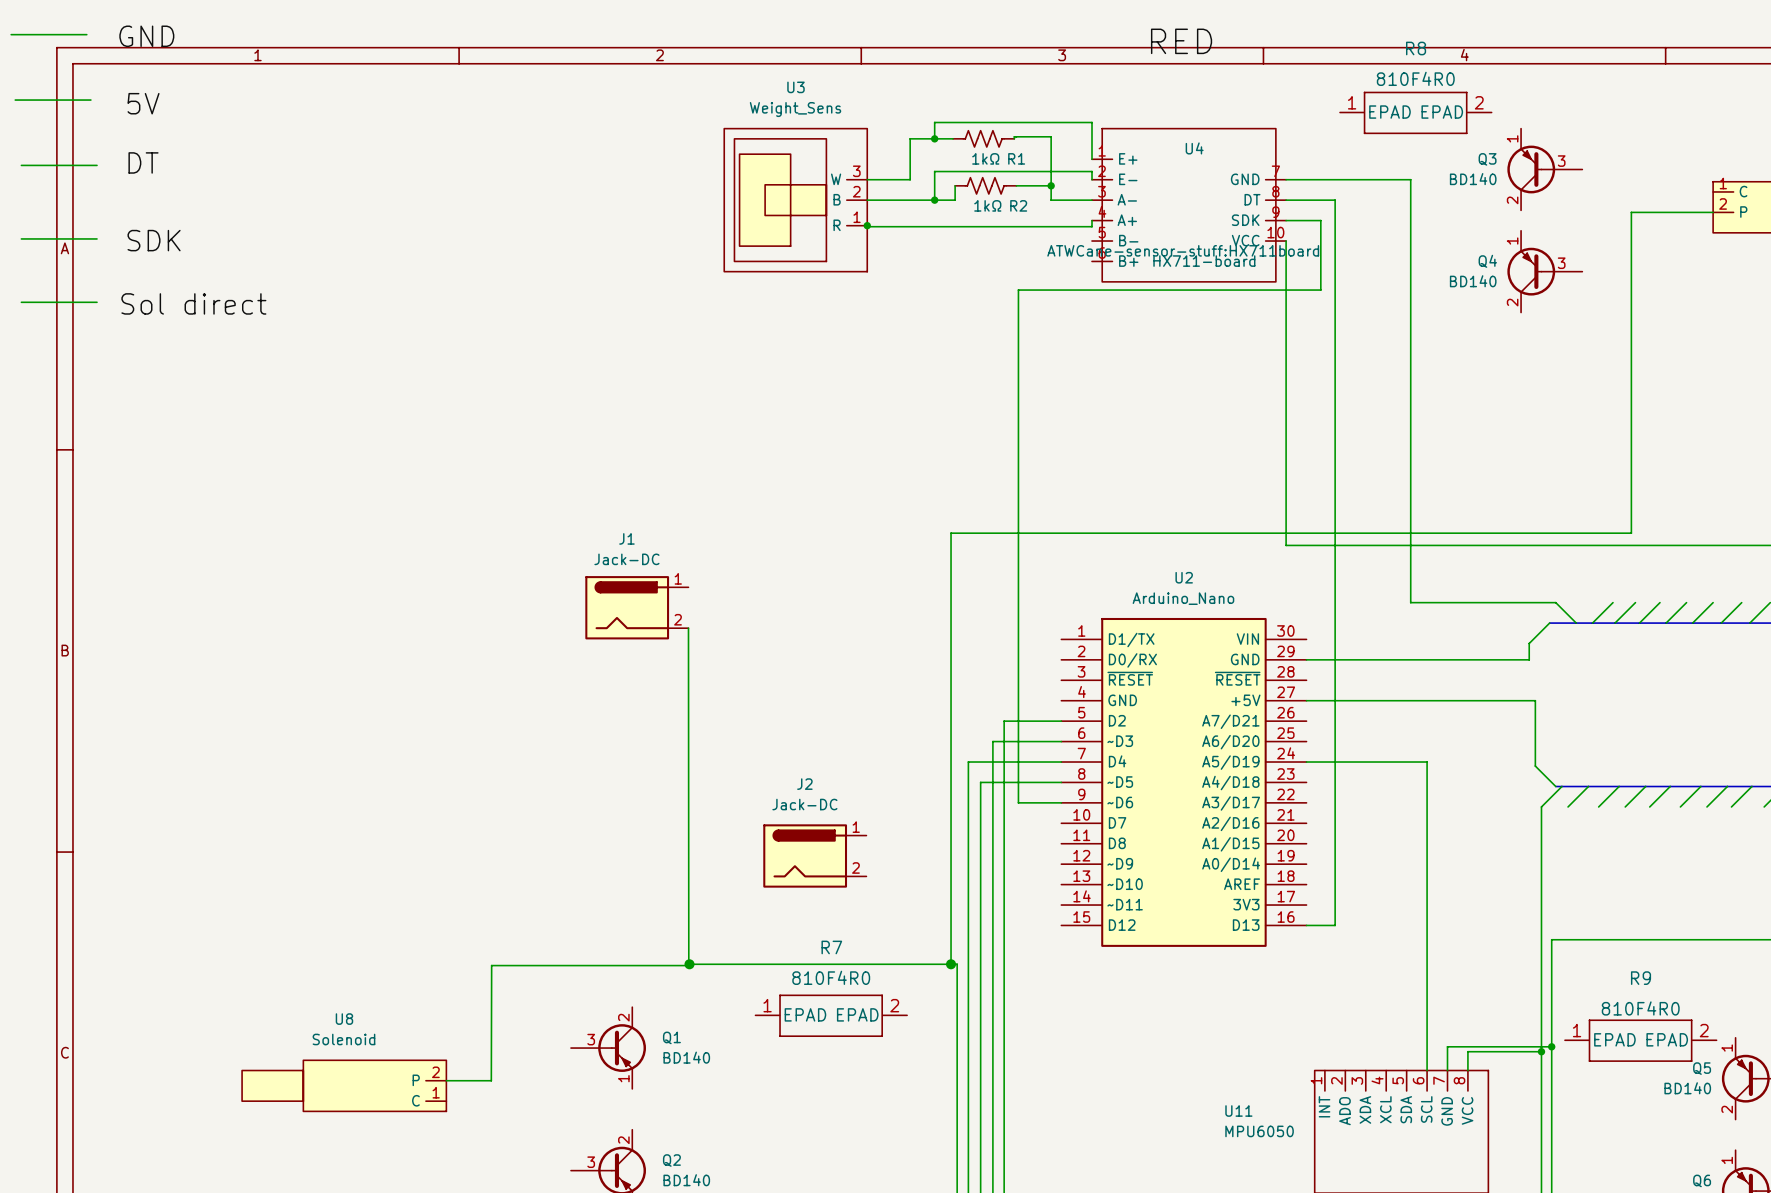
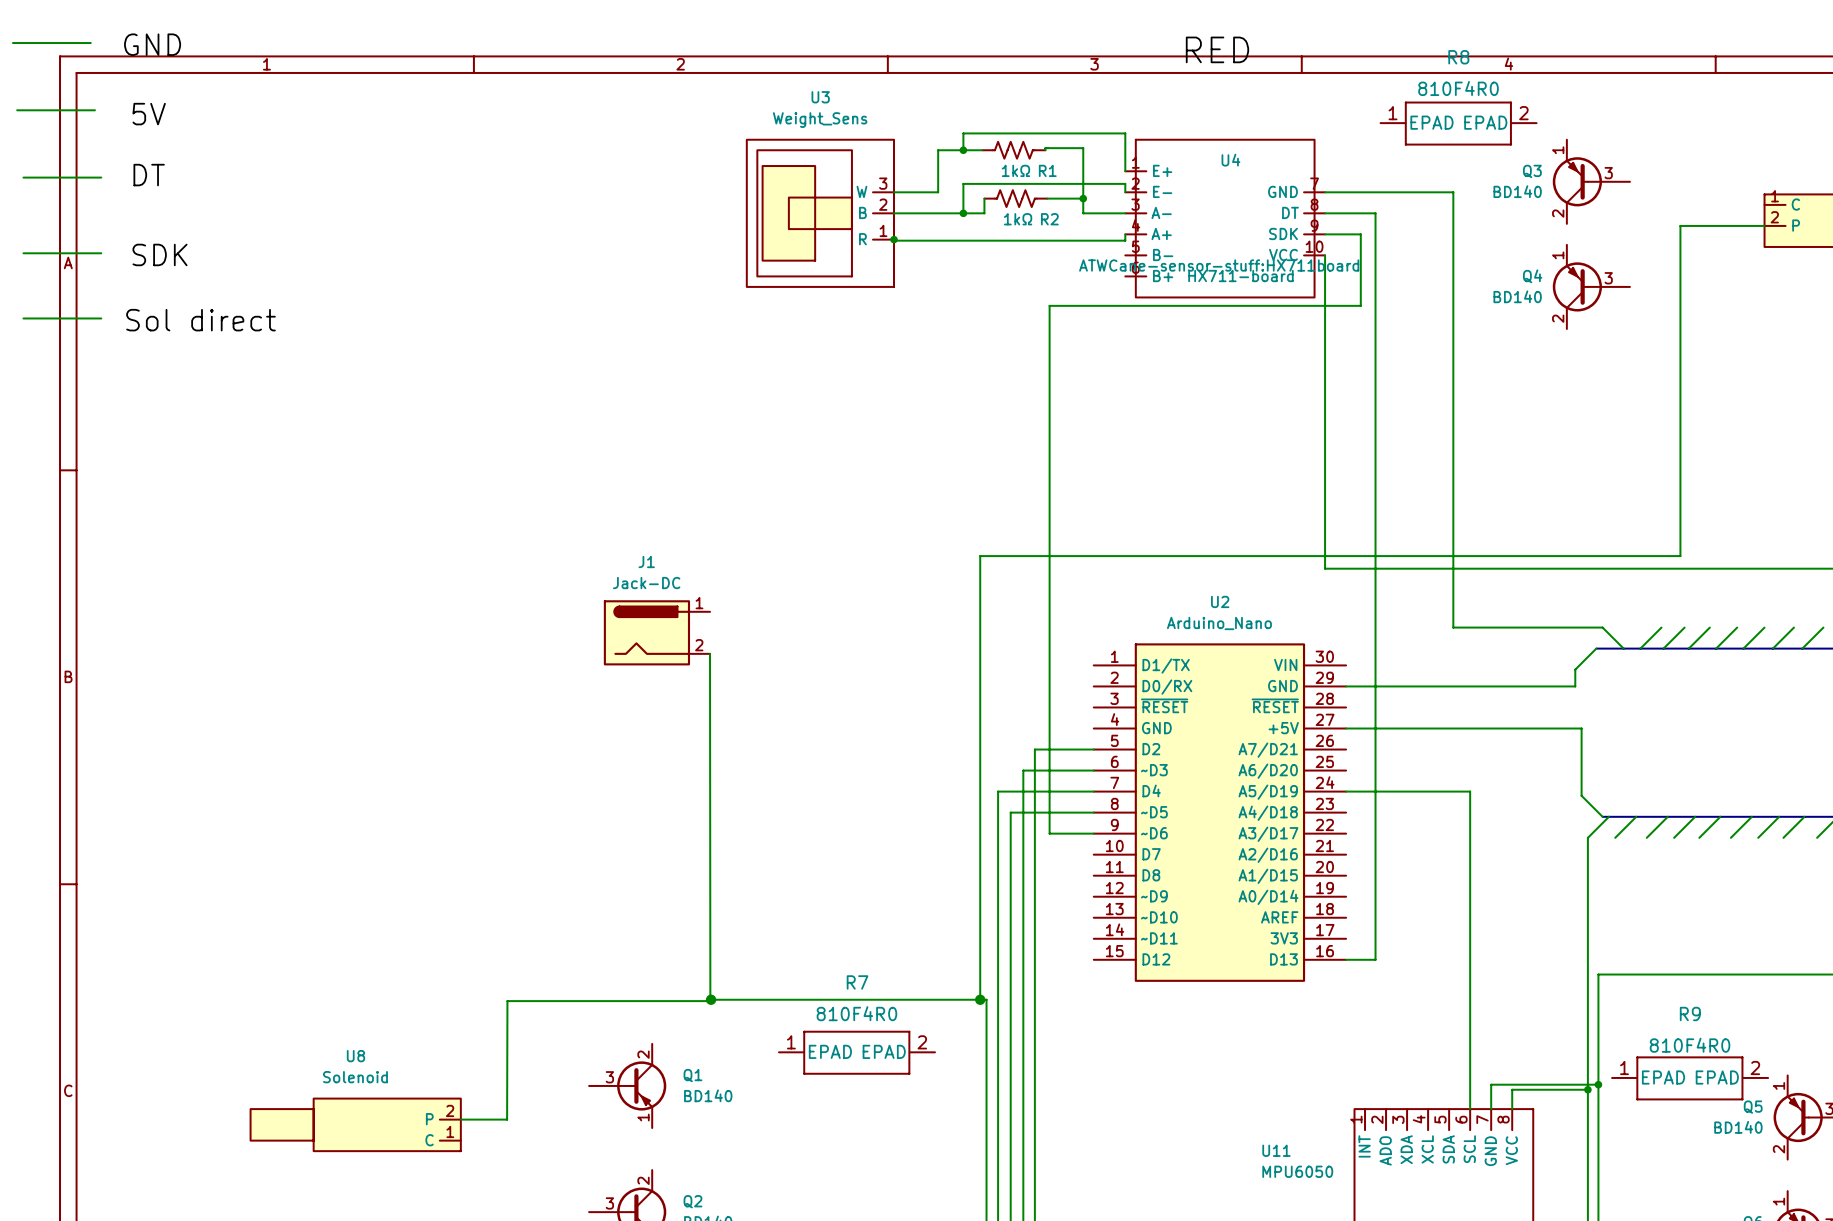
J2: Jack-DC (814, 855) -> none

